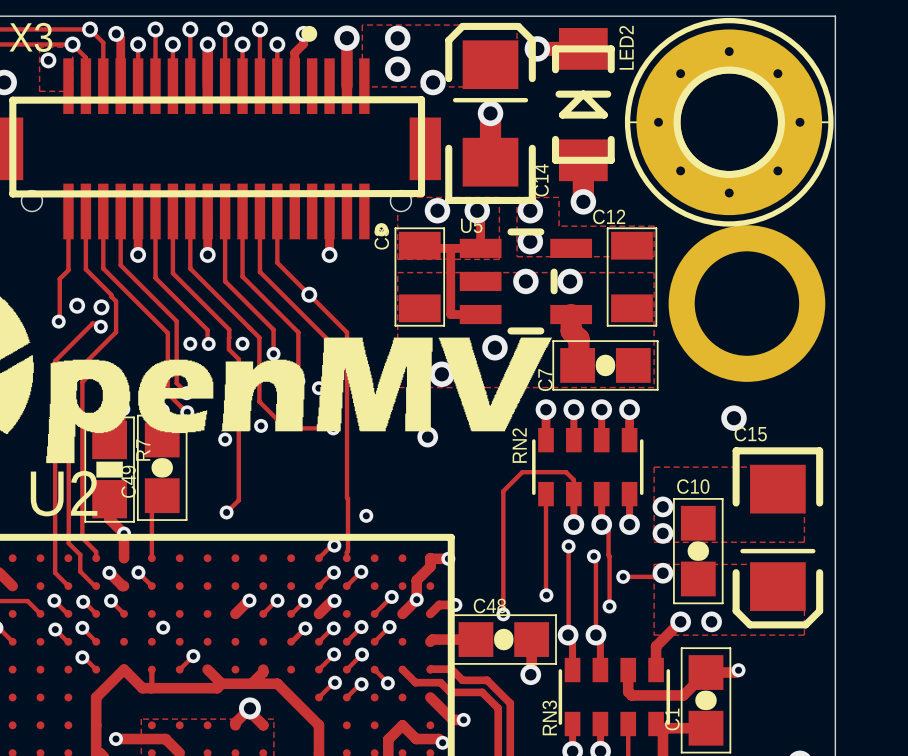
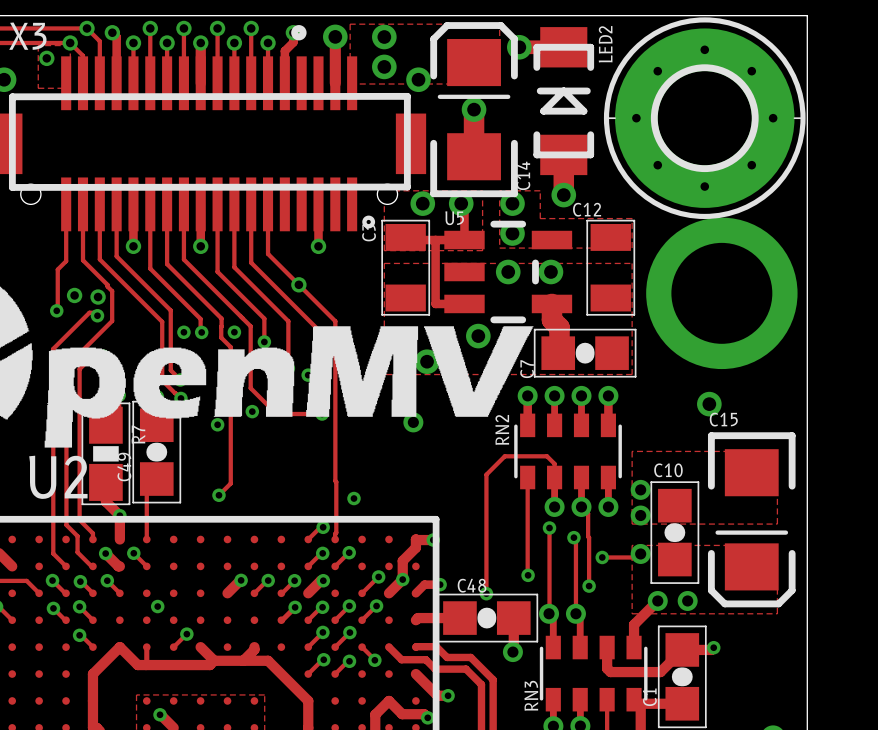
via: (249, 708) -> none
track: (235, 725) (235, 722) (249, 708) (249, 711) (263, 725) -> none
track: (115, 739) (166, 739) -> none
via: (115, 739) -> none
via: none -> (160, 714)

